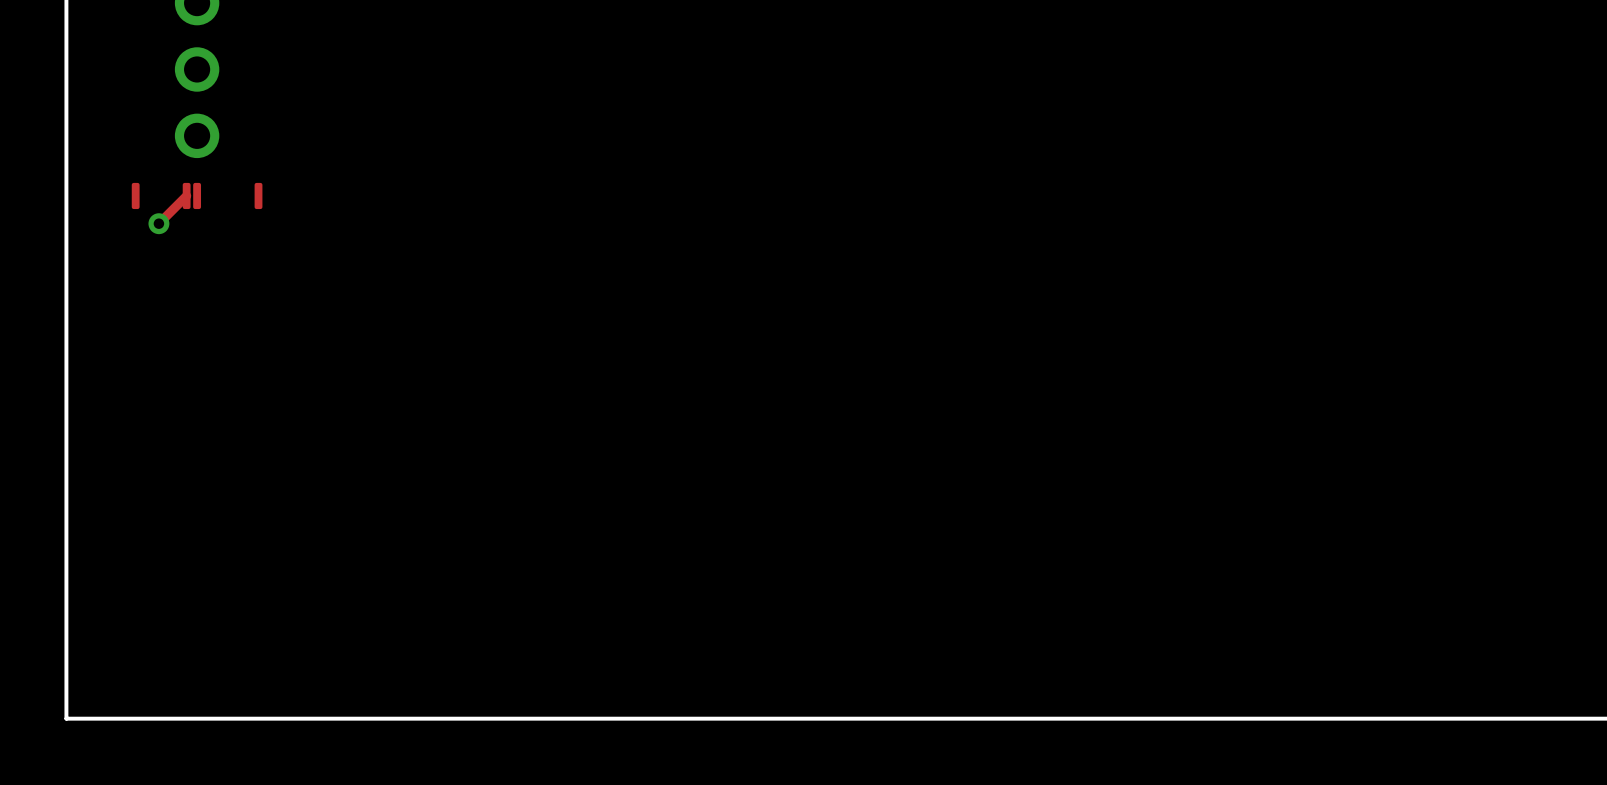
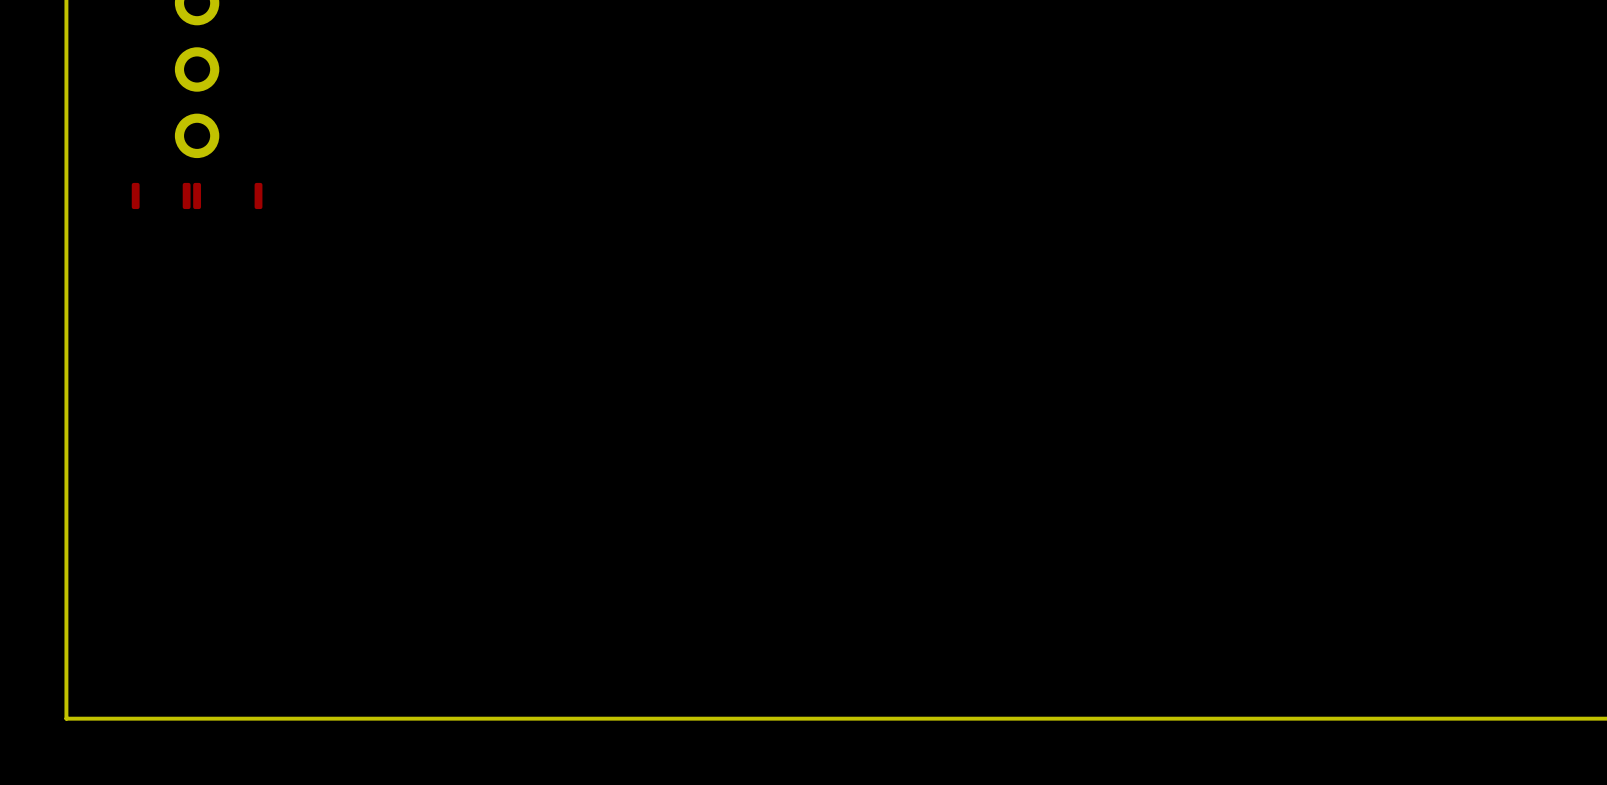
top track: (186, 195) (158, 223) -> none
via: (158, 223) -> none

